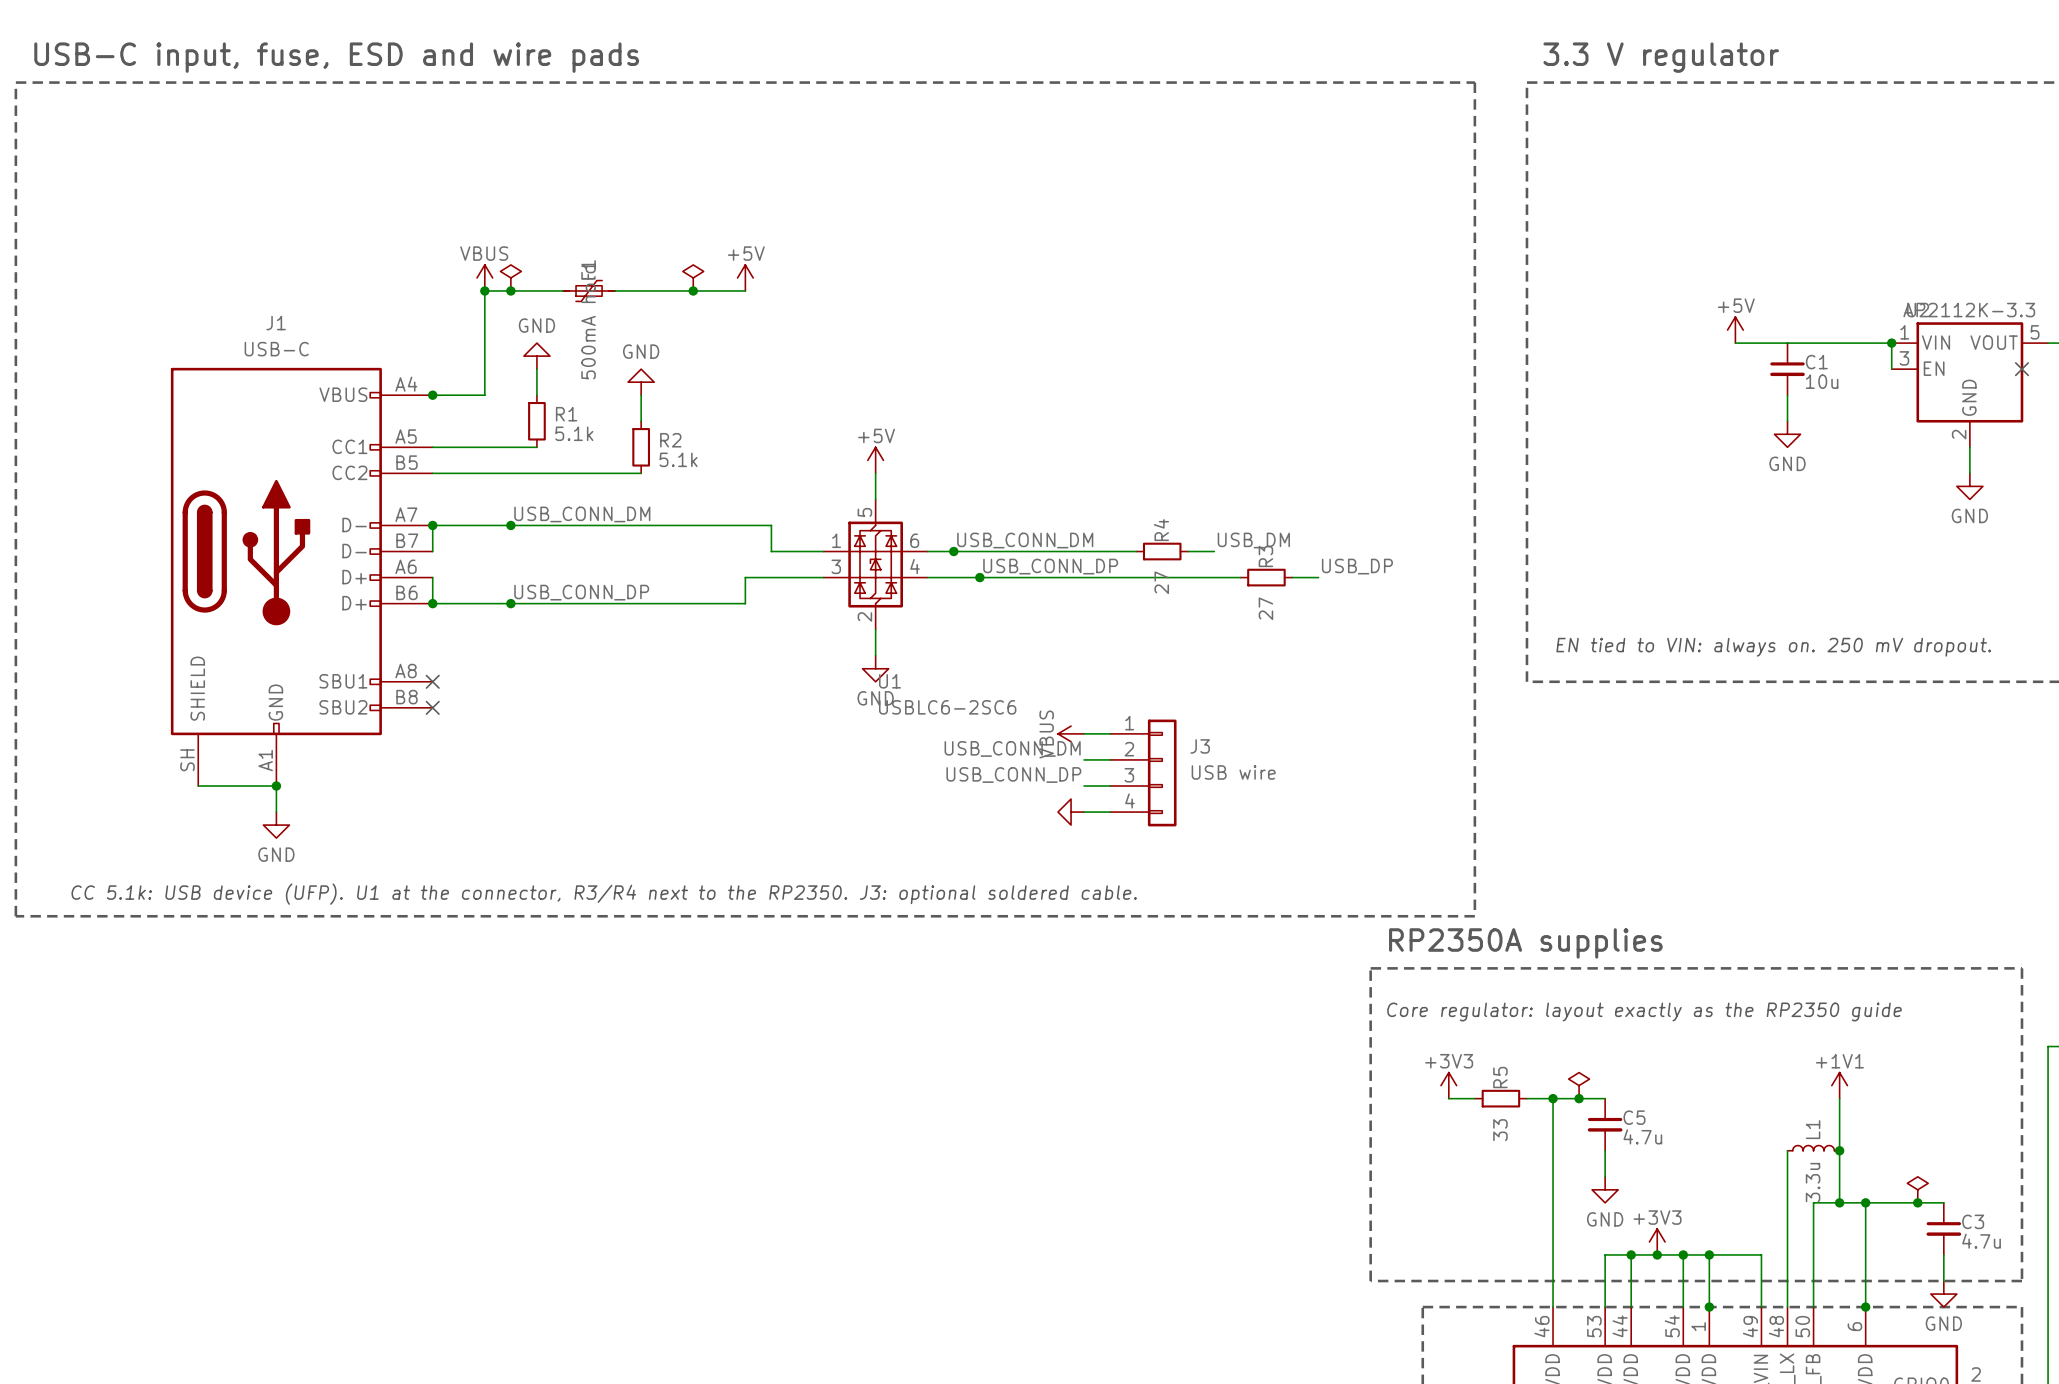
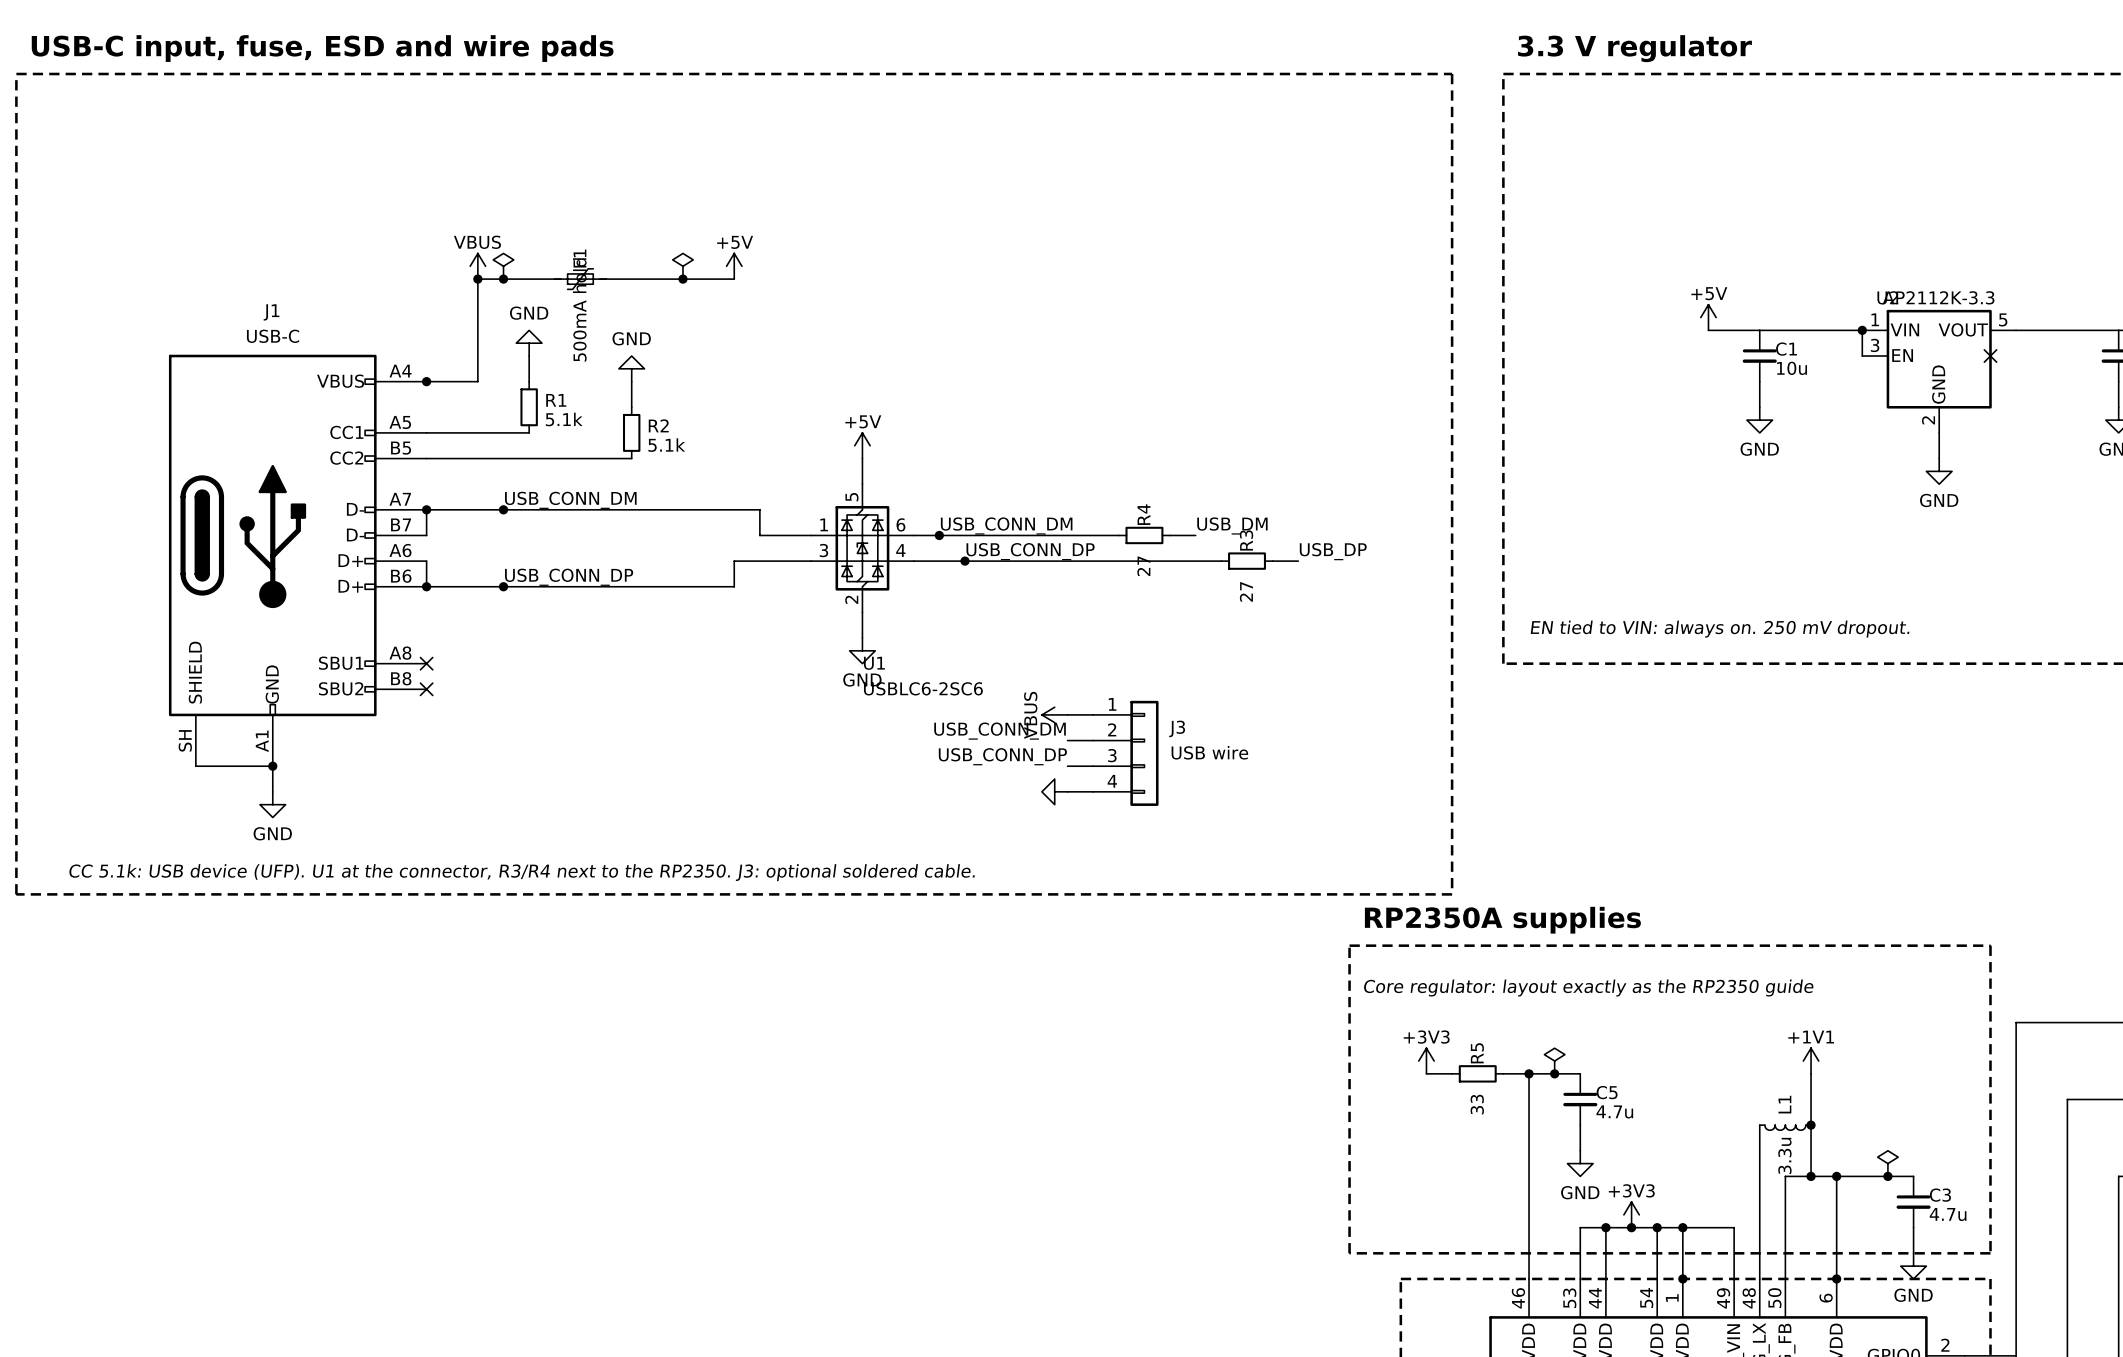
L1 rotation: 0° (1813, 1148) -> 180° (1785, 1127)

